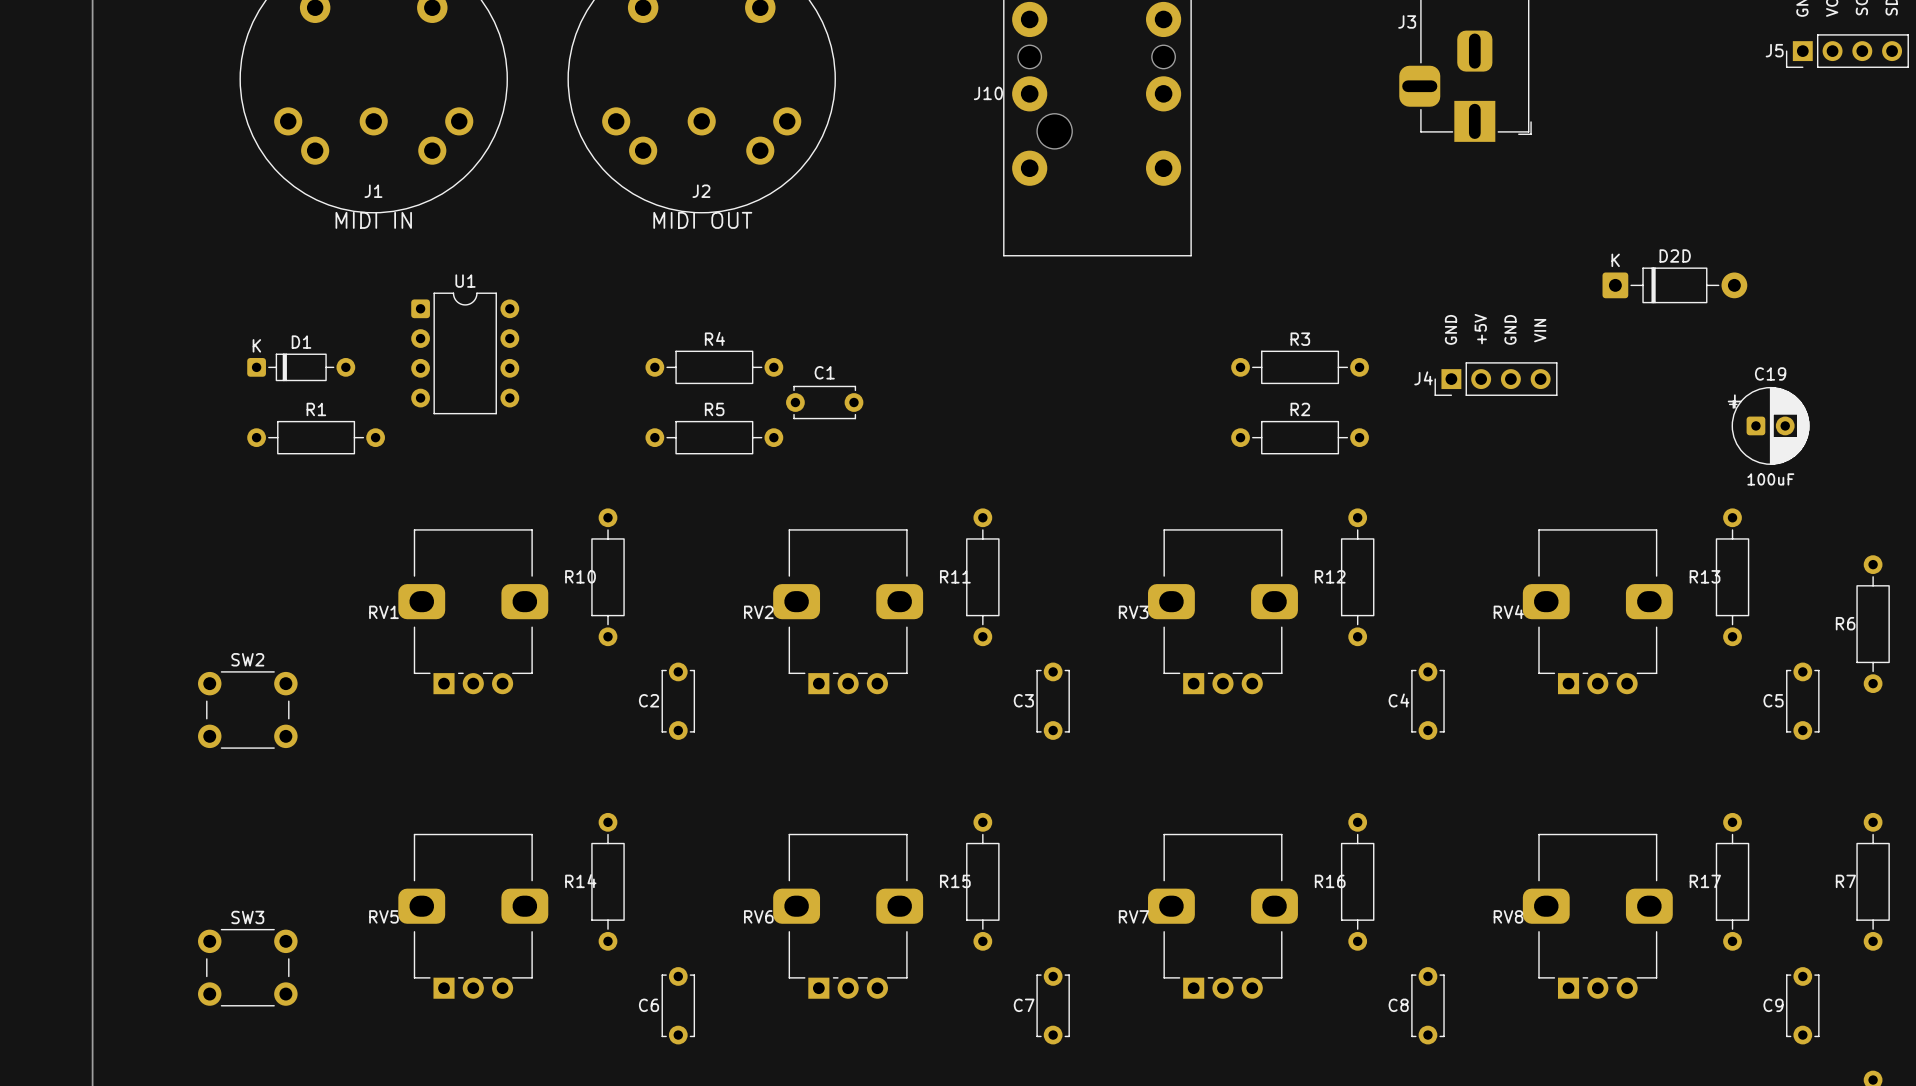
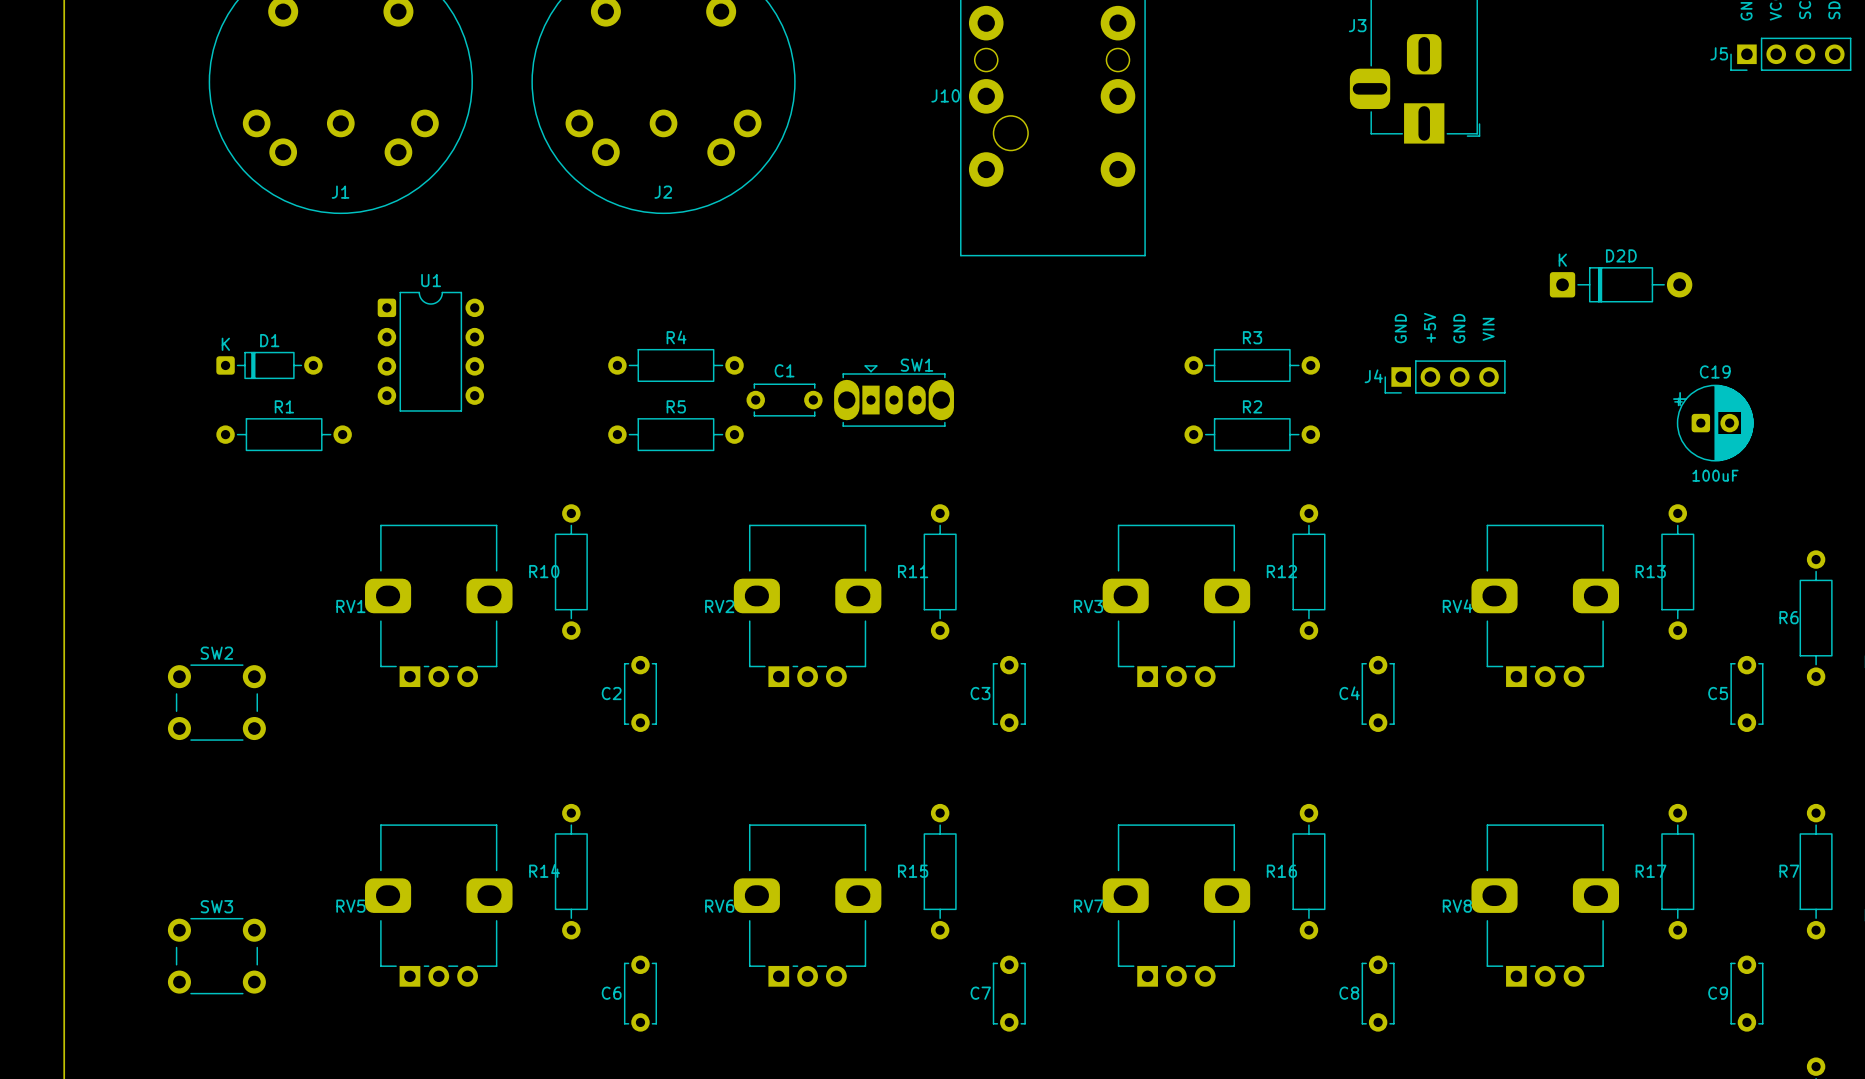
text: MIDI IN (373, 220) -> none
text: MIDI OUT (702, 220) -> none
SW1: none -> (894, 396)

